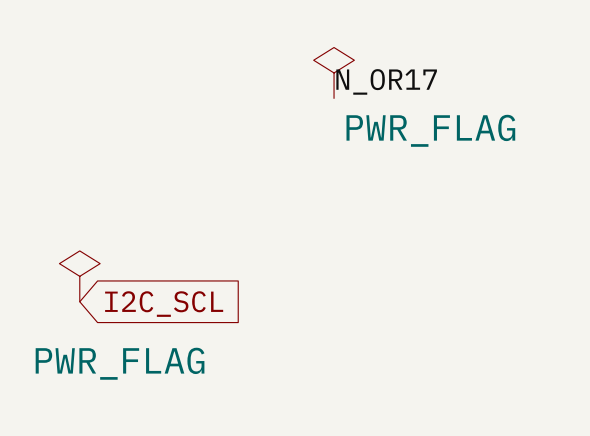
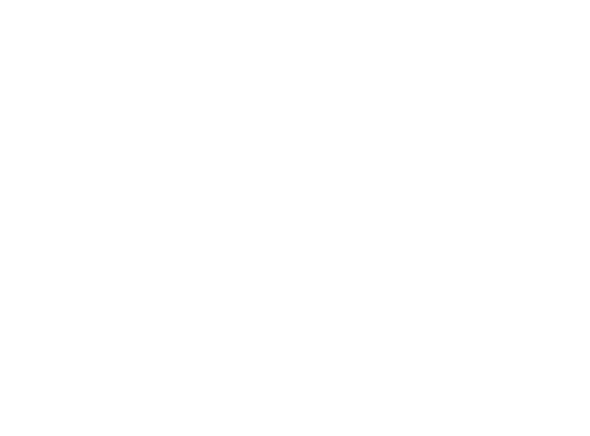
power symbol: PWR_FLAG (334, 72) -> none
label: N_OR17 (386, 81) -> none
power symbol: PWR_FLAG (79, 276) -> none
global label: I2C_SCL (164, 304) -> none

